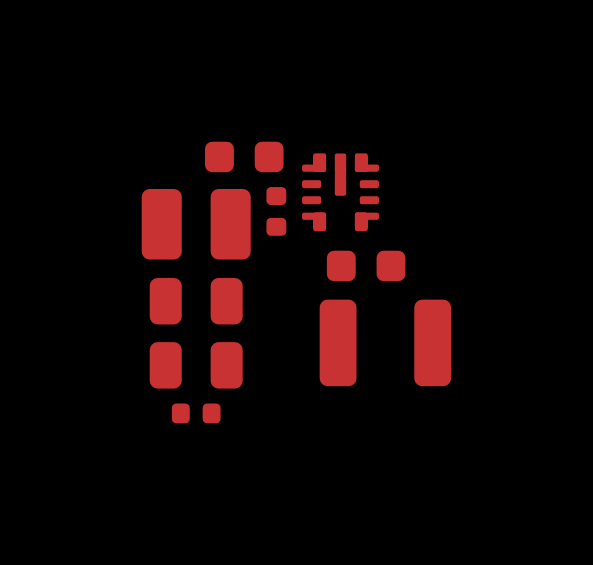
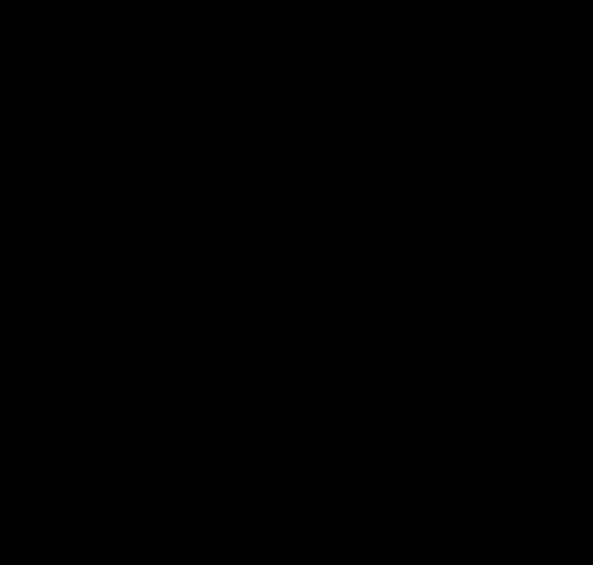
part: (244, 156) -> none
part: (340, 192) -> none
part: (276, 211) -> none
part: (196, 224) -> none
part: (366, 265) -> none
part: (196, 301) -> none
part: (385, 342) -> none
part: (196, 365) -> none
part: (196, 413) -> none

